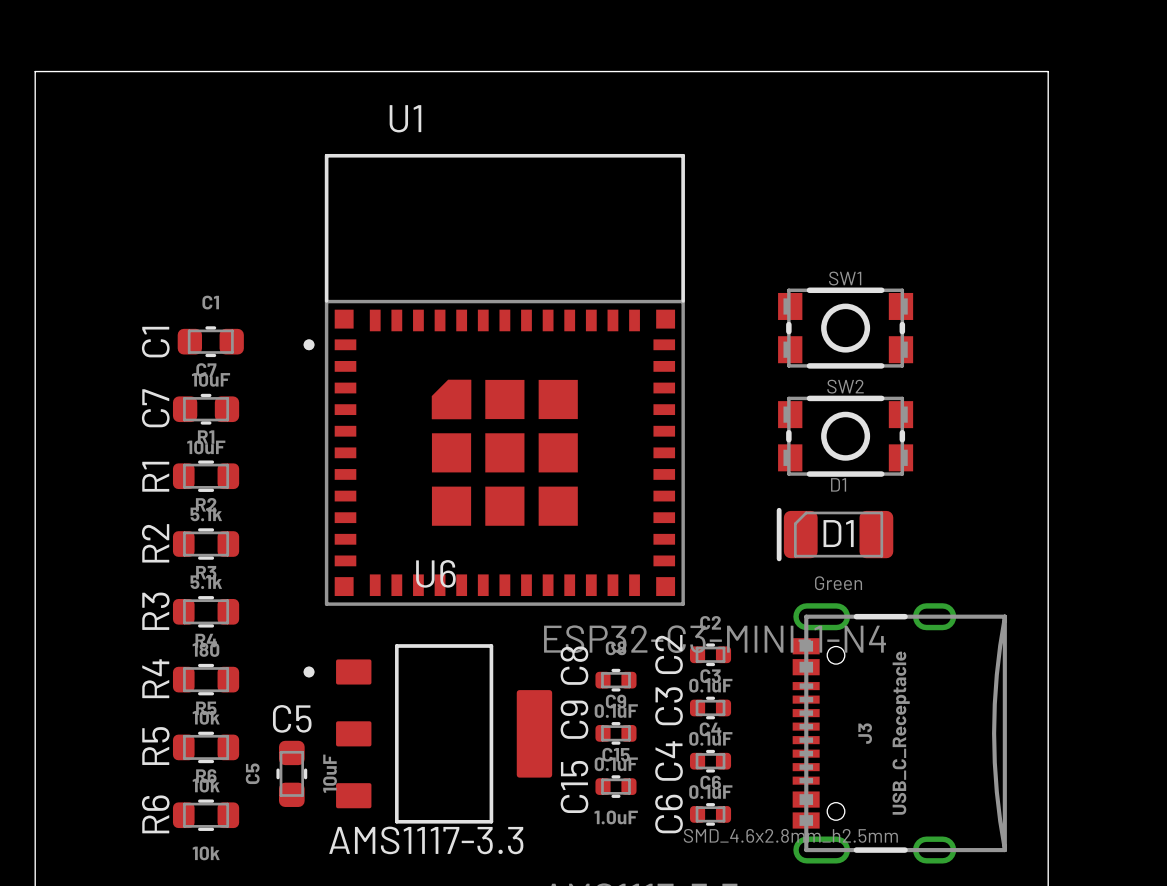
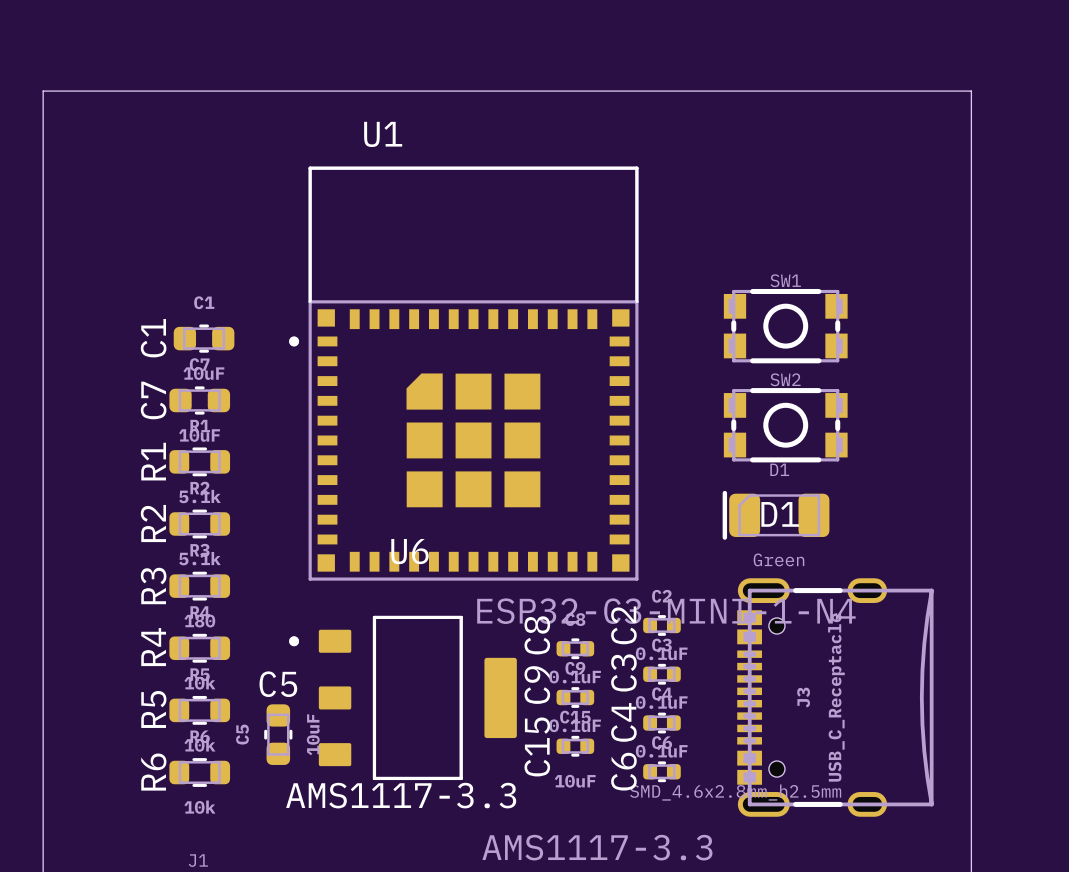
C15 value: 1.0uF (616, 817) -> 10uF (575, 781)

